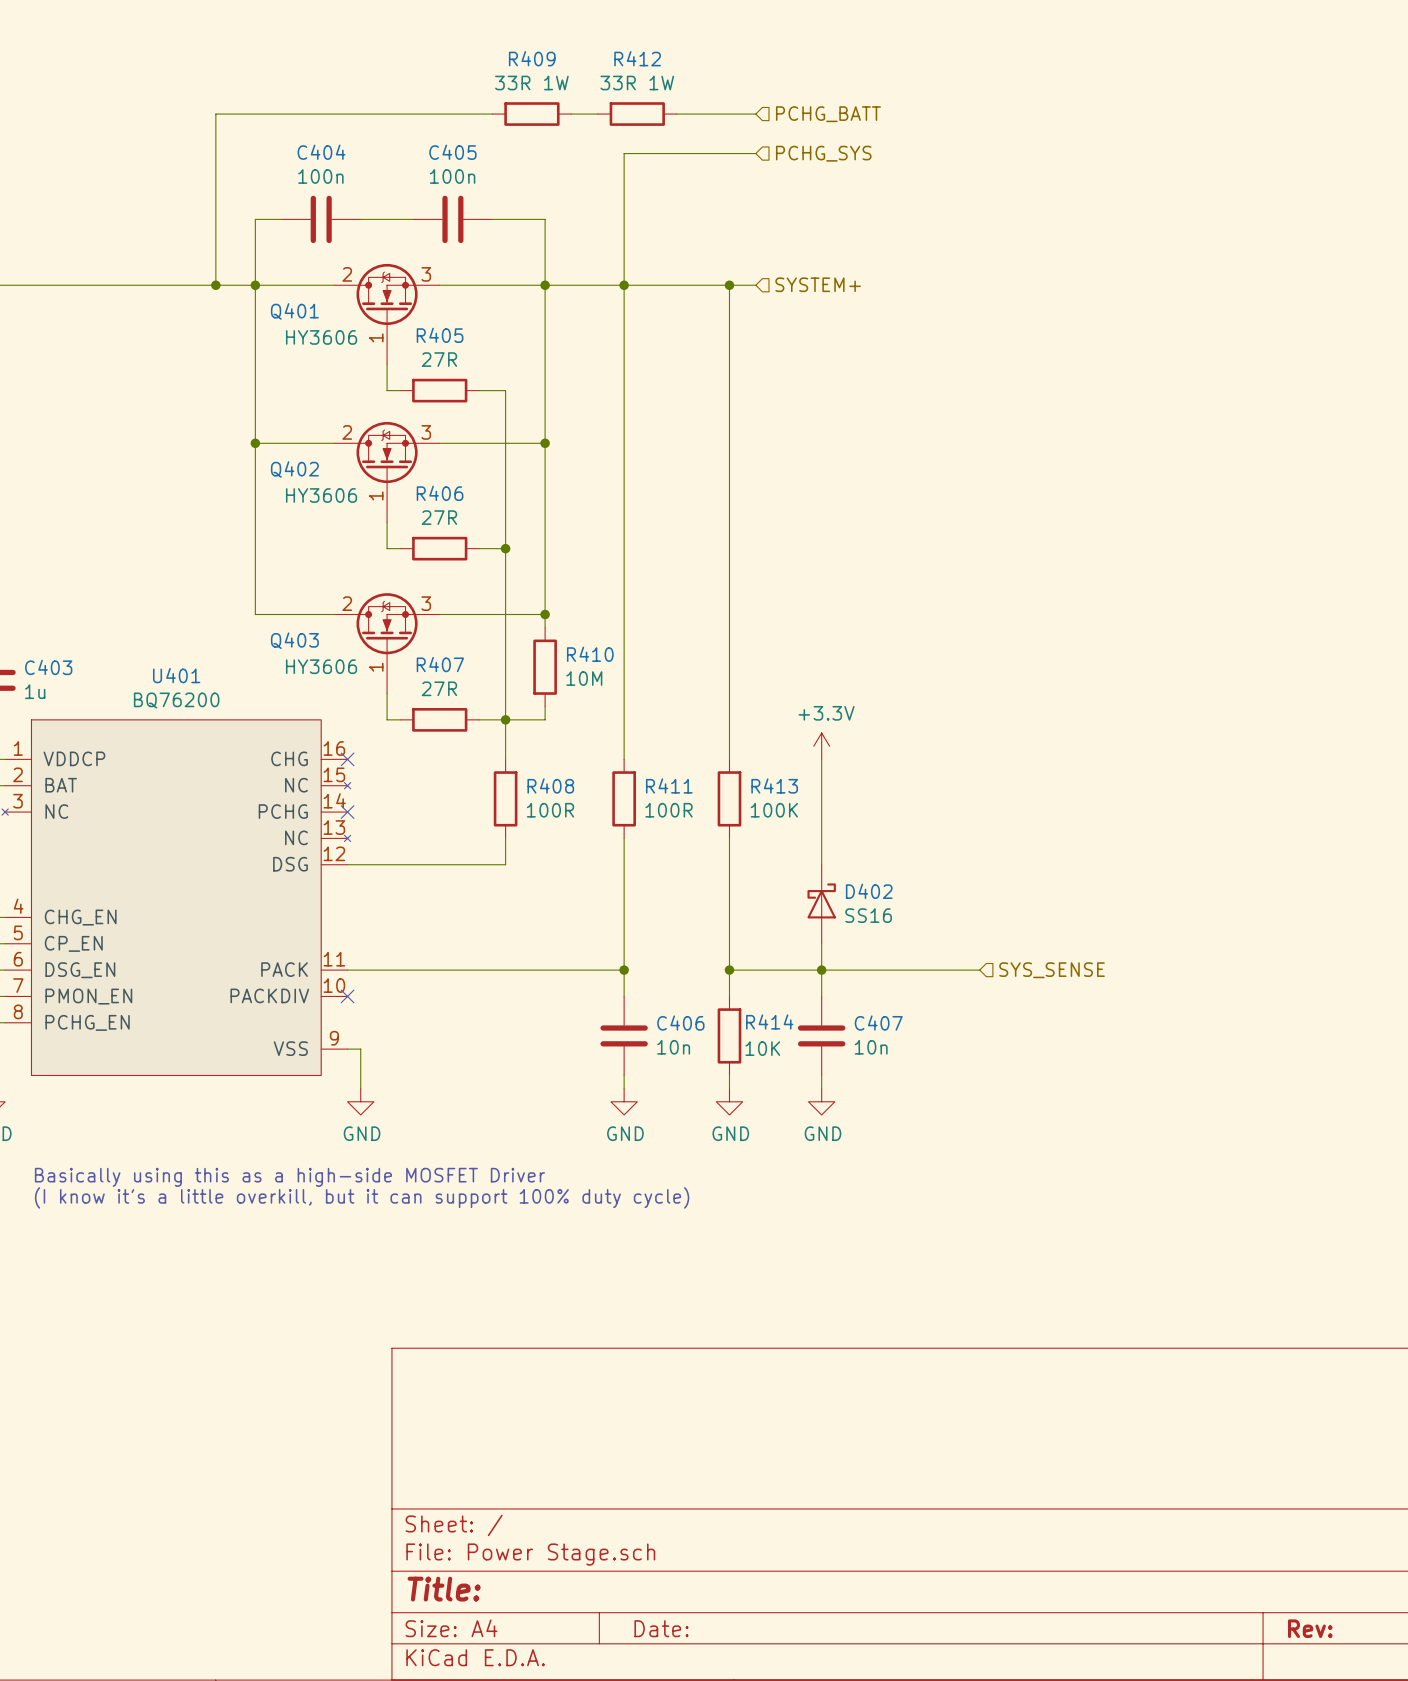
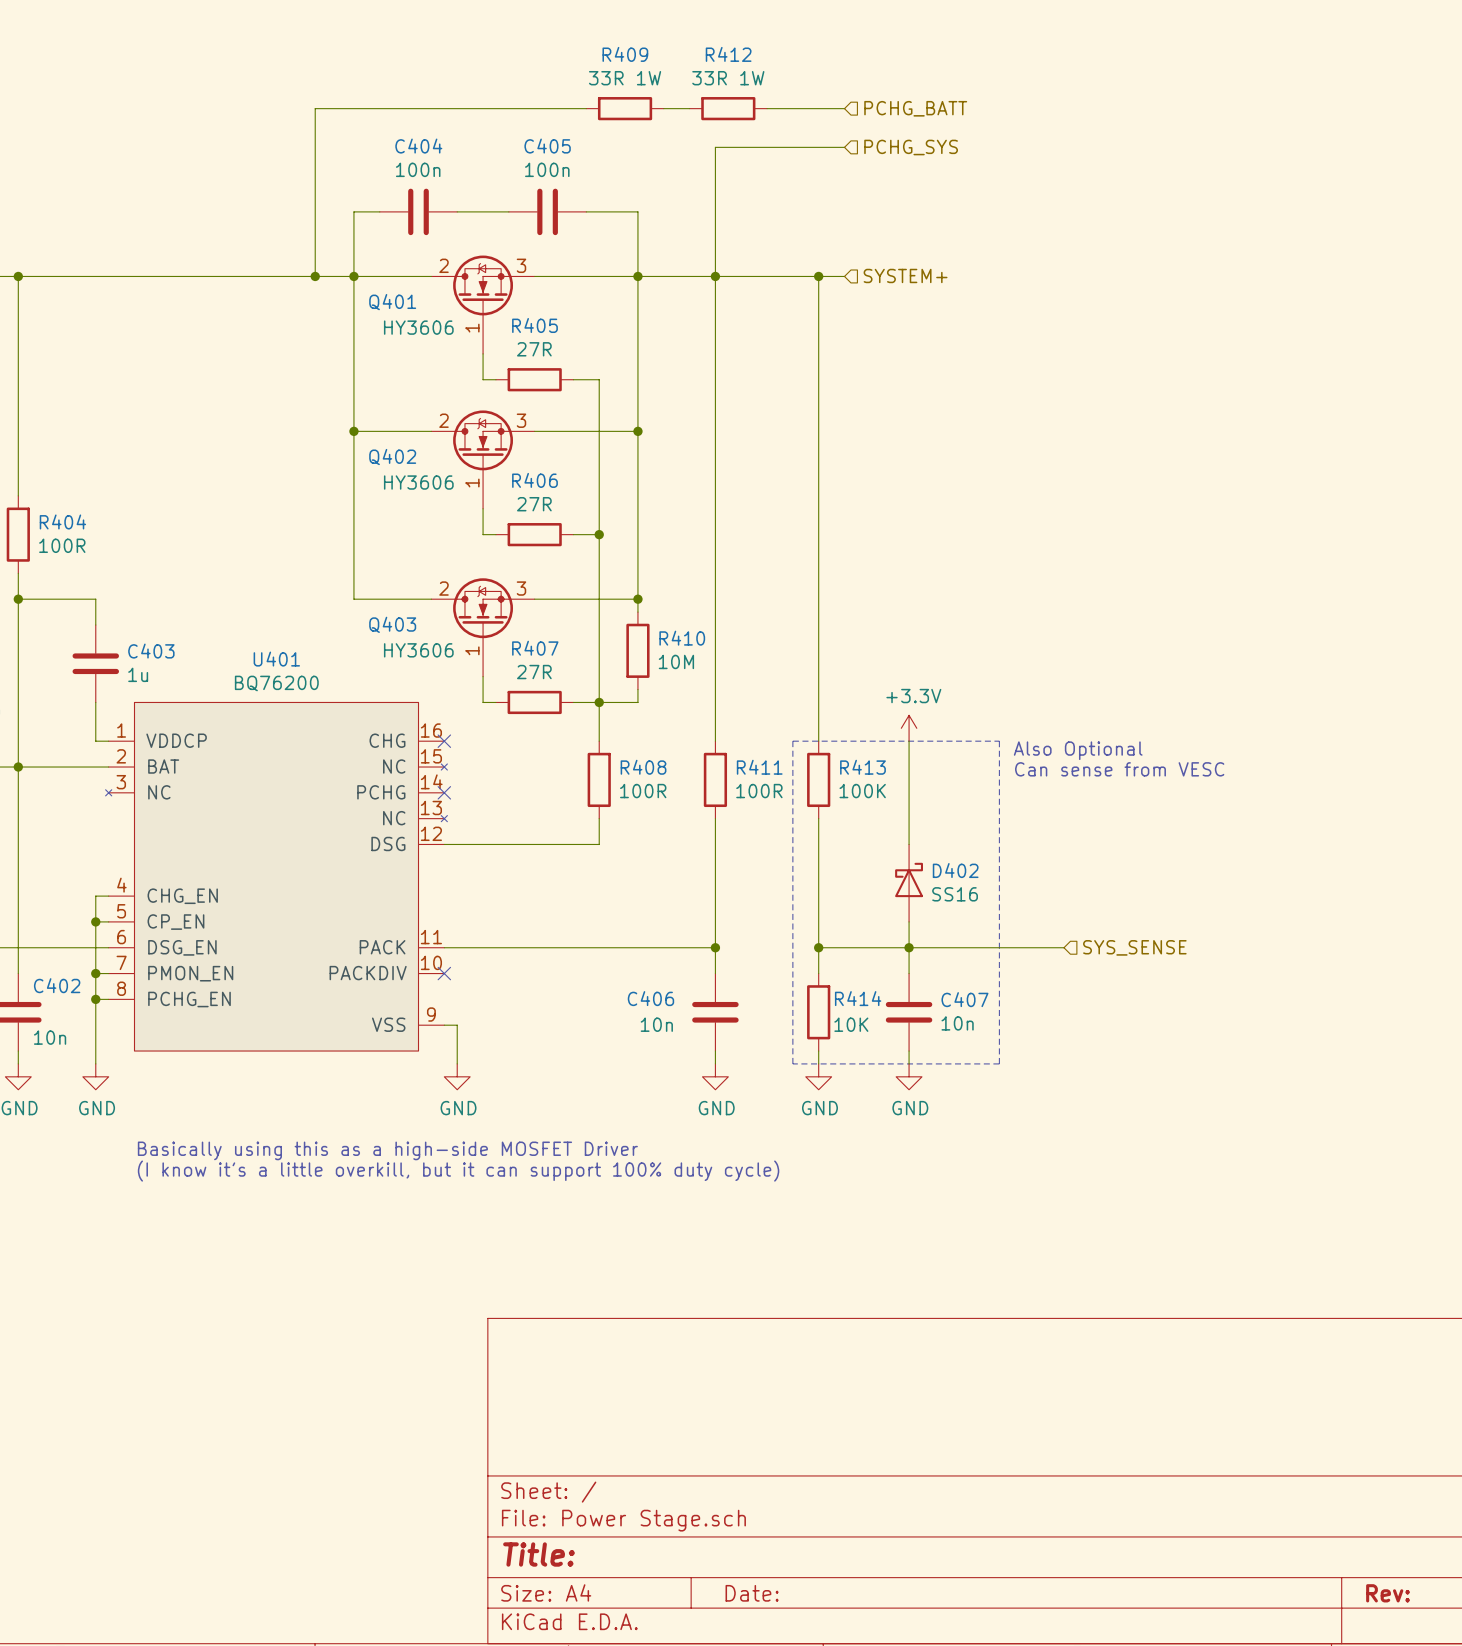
line: none -> (792, 741) (999, 741) (999, 1063) (792, 1063) (792, 741)
text: none -> Also Optional (1078, 750)
text: none -> Can sense from VESC (1119, 769)
C406 name position: C406 (680, 1023) -> C406 (650, 998)
C406 value position: 10n (673, 1047) -> 10n (656, 1024)

